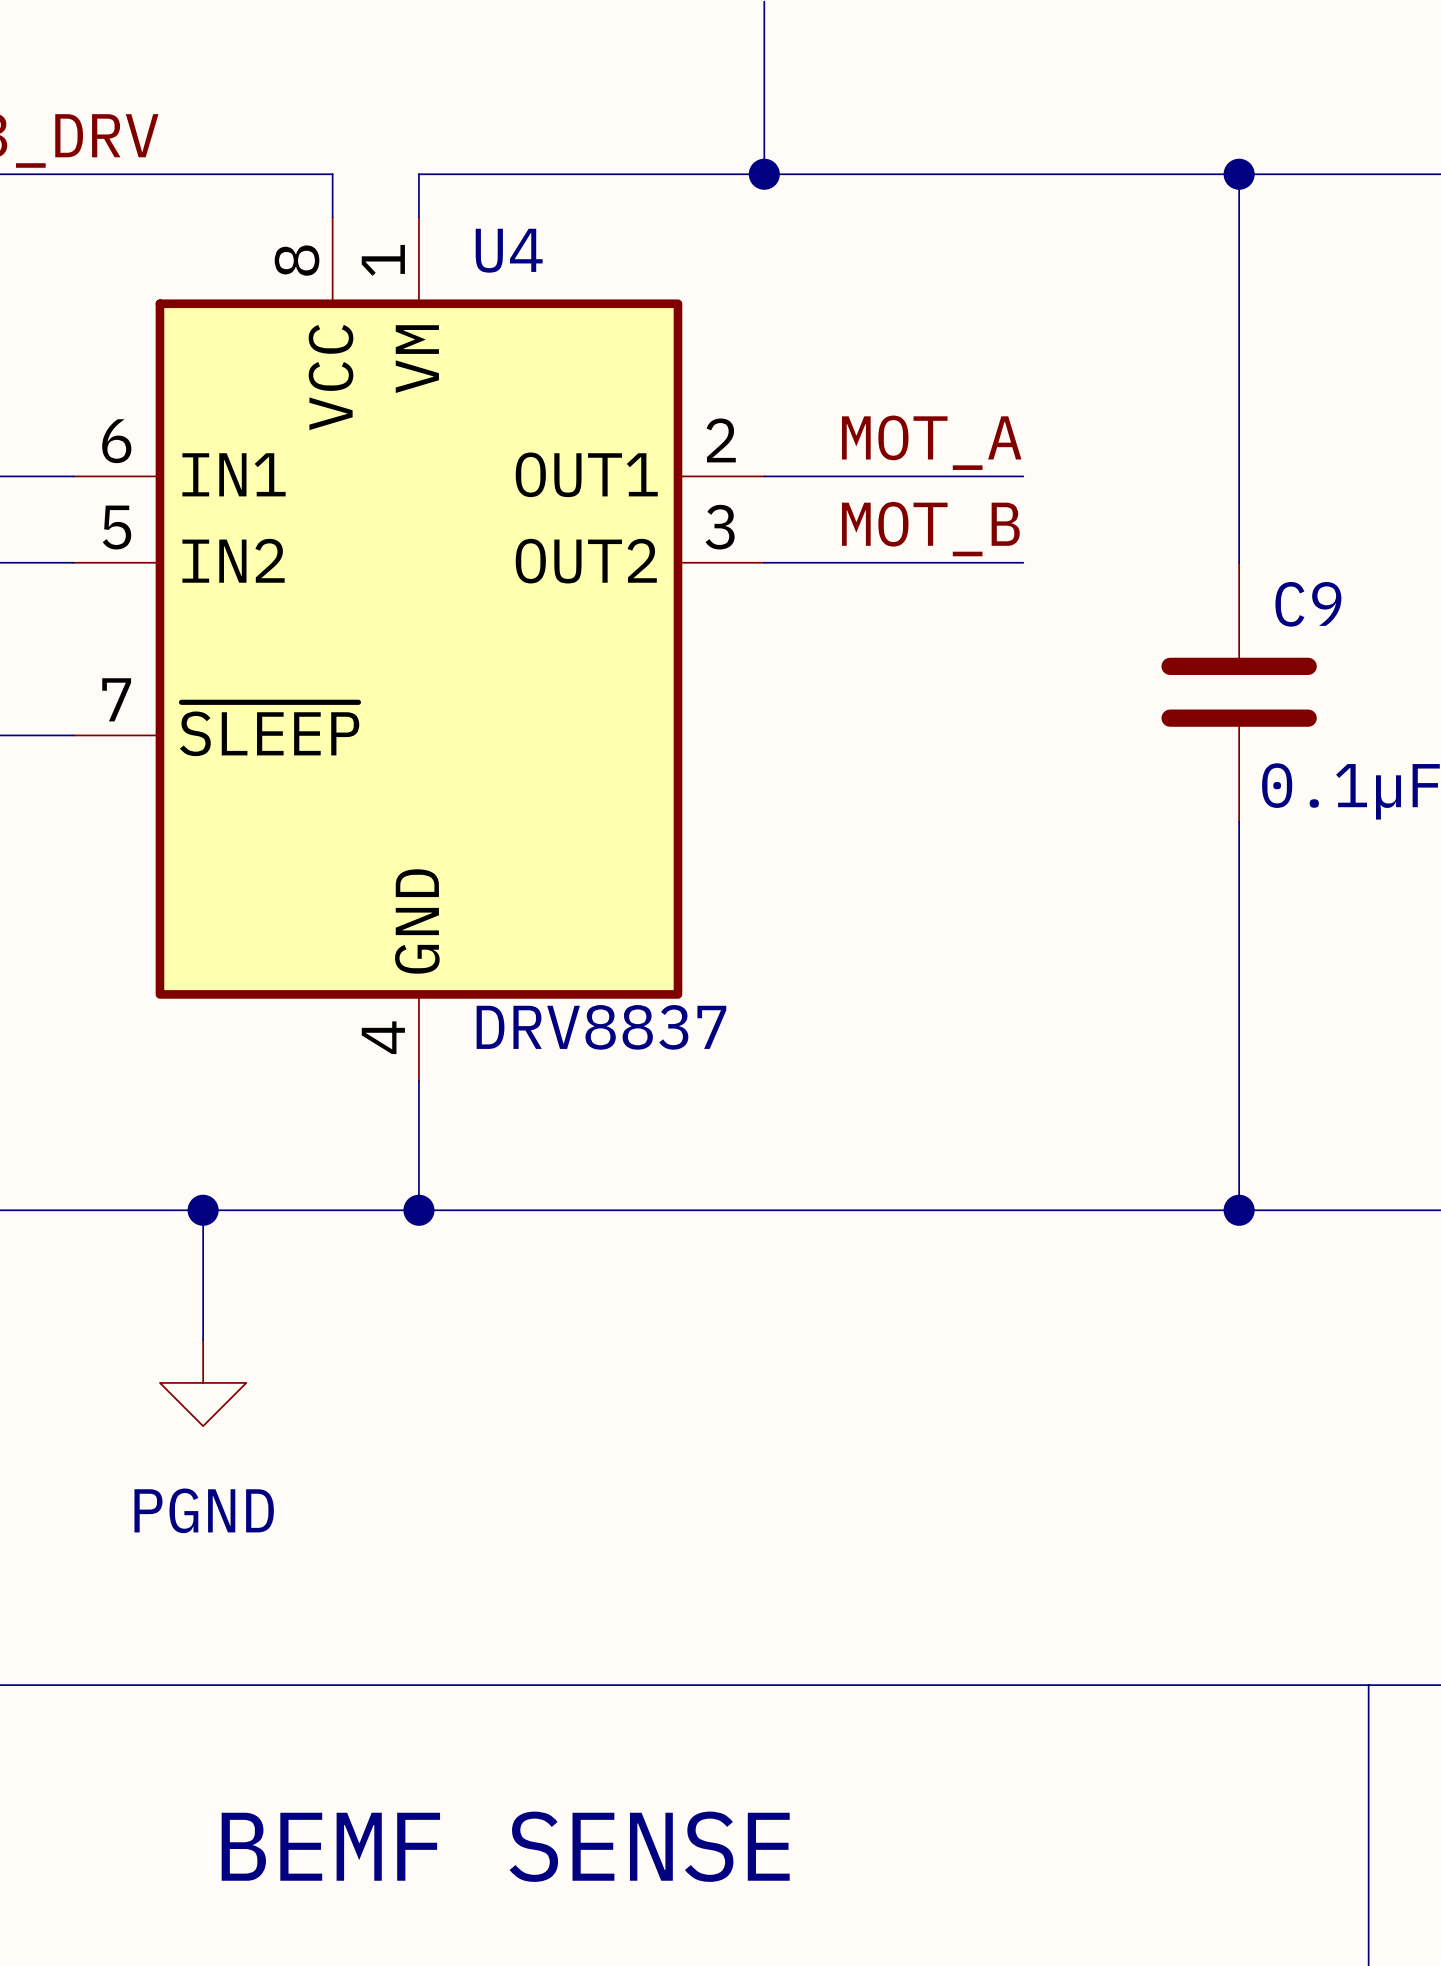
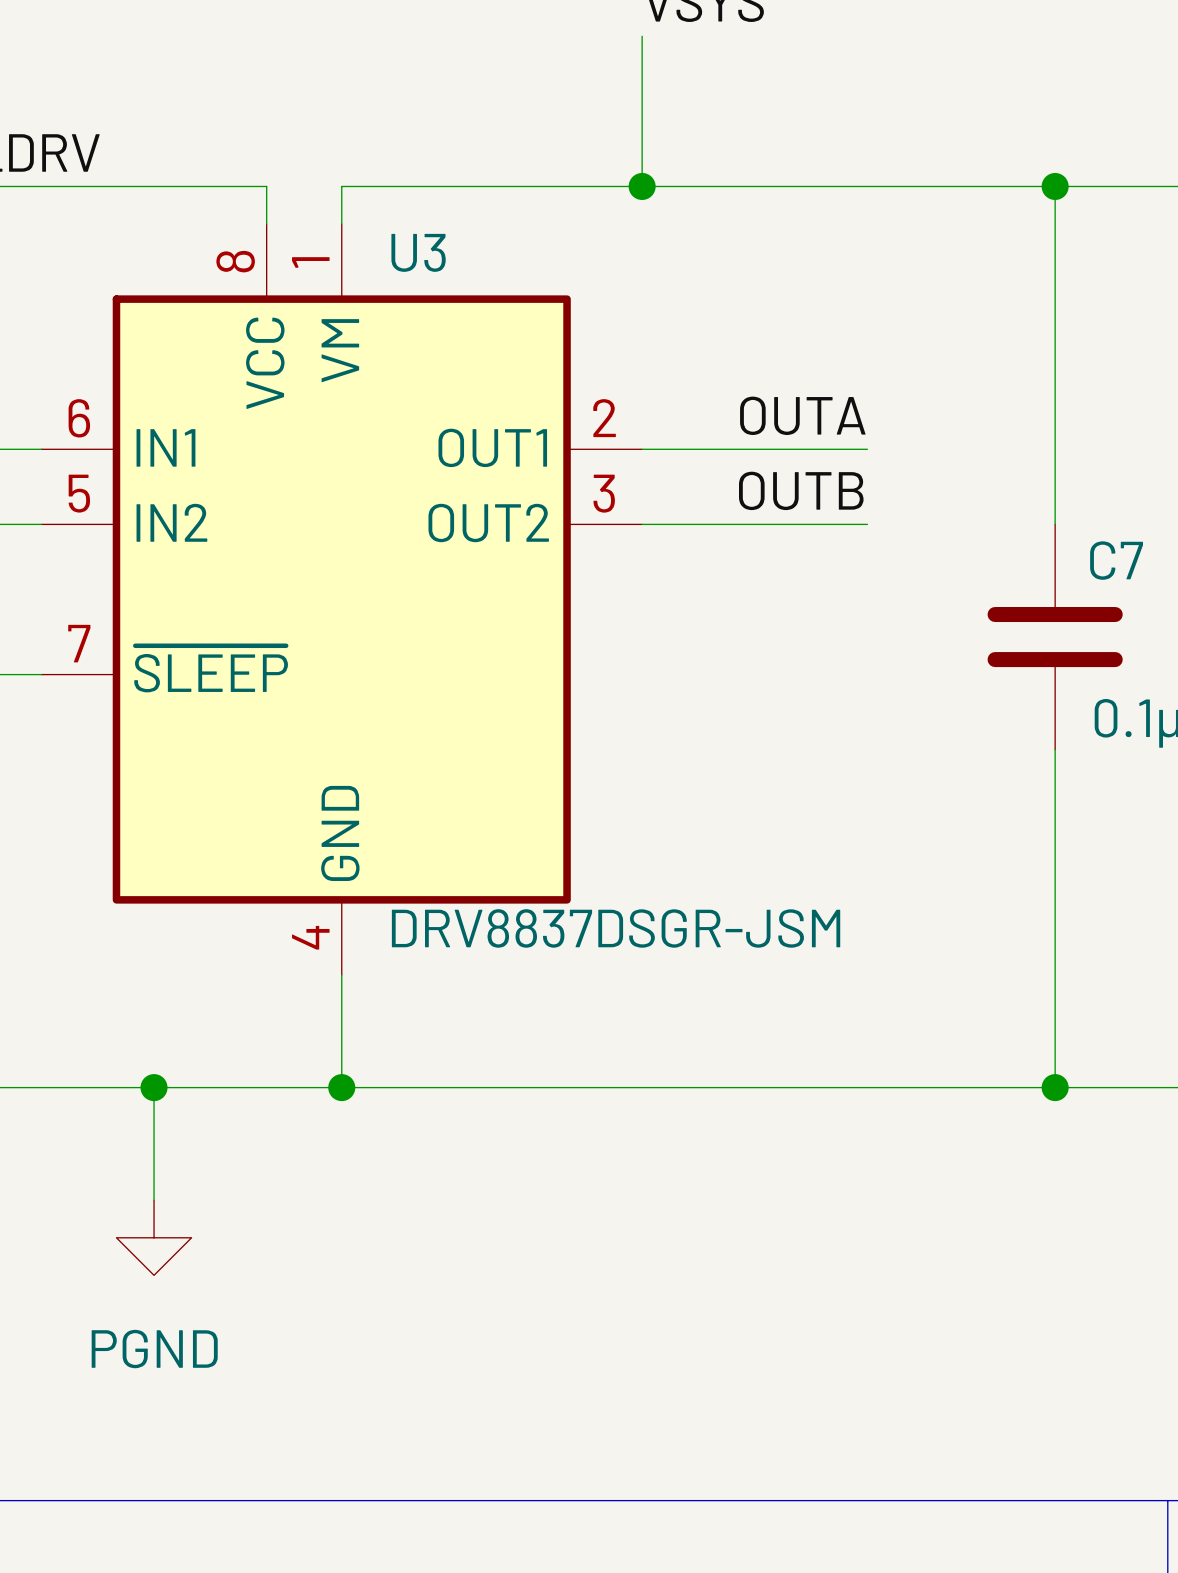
U4 name: U4 (509, 250) -> U3 (418, 252)
label: MOT_A (931, 442) -> OUTA (802, 415)
label: MOT_B (930, 529) -> OUTB (801, 490)
C9 name: C9 (1308, 604) -> C7 (1116, 560)
U4 value: DRV8837 (601, 1027) -> DRV8837DSGR-JSM (616, 928)

